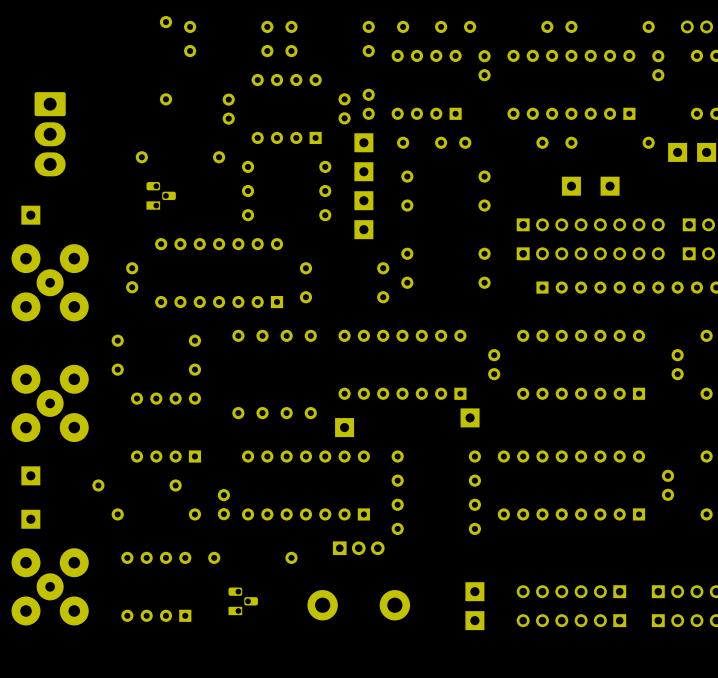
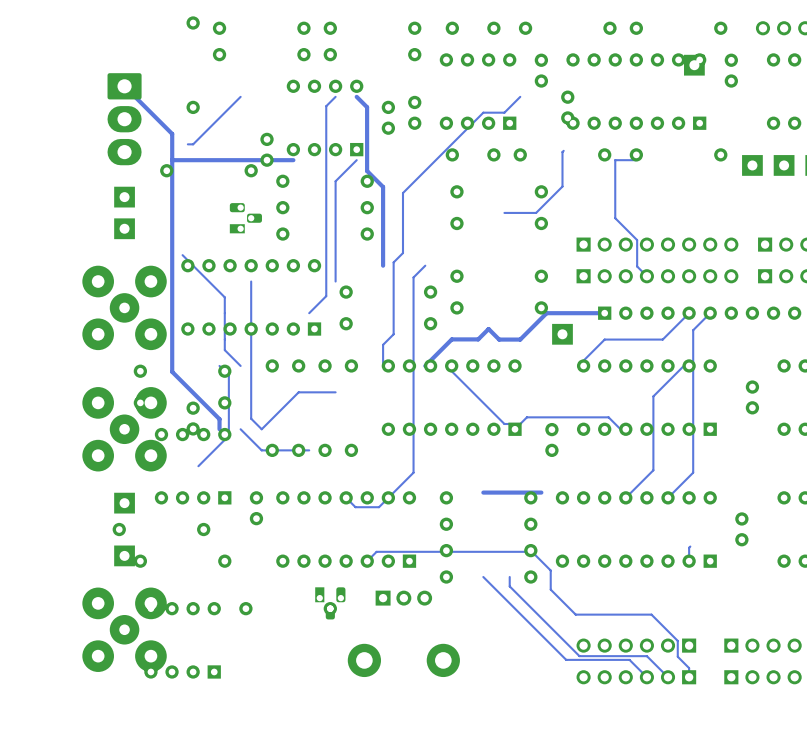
part: none -> (694, 65)
track: none -> (124, 86) (172, 133) (172, 371) (219, 419) (219, 429)
track: none -> (240, 96) (193, 144) (187, 144)
track: none -> (335, 96) (326, 106) (326, 296) (309, 313)
track: none -> (356, 96) (367, 107) (367, 171) (383, 187) (383, 265)
track: none -> (520, 96) (504, 112) (483, 112) (402, 193) (402, 253) (393, 262) (393, 334) (383, 344) (383, 365)
part: none -> (567, 107)
part position: (228, 109) -> (267, 149)
part position: (50, 134) -> (124, 119)
track: none -> (563, 150) (562, 186) (536, 212) (504, 212)
part: (363, 142) -> none
track: none -> (172, 160) (293, 160)
track: none -> (356, 160) (335, 181) (335, 281)
track: none -> (636, 160) (615, 160) (615, 218) (637, 240) (637, 266) (646, 276)
part: (363, 171) -> none
part: none -> (124, 197)
part: (571, 186) -> none
part: (610, 186) -> none
part position: (161, 195) -> (245, 218)
part: (363, 200) -> none
part: none -> (124, 228)
part: (30, 215) -> none
part: (363, 229) -> none
track: none -> (182, 255) (224, 297) (224, 350) (240, 365)
track: none -> (425, 265) (413, 277) (413, 472) (379, 507) (355, 507) (346, 497)
track: none -> (251, 281) (251, 418) (261, 429) (298, 392) (335, 392)
part: (132, 277) -> none
part position: (50, 282) -> (124, 307)
track: none -> (604, 313) (546, 313) (520, 339) (499, 339) (488, 329) (478, 339) (451, 339) (425, 365)
track: none -> (689, 313) (662, 339) (604, 339) (578, 365)
track: none -> (710, 313) (693, 330) (693, 472) (668, 497)
part: none -> (562, 334)
track: none -> (219, 365) (228, 375) (228, 435) (198, 466)
track: none -> (446, 365) (504, 423) (520, 423) (526, 417) (608, 417) (620, 429)
track: none -> (683, 365) (653, 396) (653, 470) (625, 497)
part position: (494, 364) -> (551, 439)
part: none -> (193, 418)
track: none -> (240, 429) (261, 450) (309, 450)
part position: (50, 403) -> (124, 429)
part: (470, 417) -> none
part: (344, 427) -> none
track: none -> (541, 492) (483, 492)
part: none -> (124, 503)
part: (30, 475) -> none
track: none -> (690, 546) (689, 561)
part position: (223, 504) -> (256, 508)
part: none -> (124, 555)
track: none -> (367, 561) (376, 551) (532, 551) (550, 570) (550, 589) (575, 614) (651, 614) (677, 640) (677, 656) (689, 668) (689, 677)
part: (30, 519) -> none
track: none -> (483, 577) (566, 659) (629, 659) (646, 677)
track: none -> (509, 577) (509, 586) (579, 656) (646, 656) (668, 677)
part position: (50, 586) -> (124, 629)
part: (474, 591) -> none
part rotation: 0° (243, 601) -> 90° clockwise (330, 603)
part position: (243, 601) -> (330, 603)
part: (474, 620) -> none

